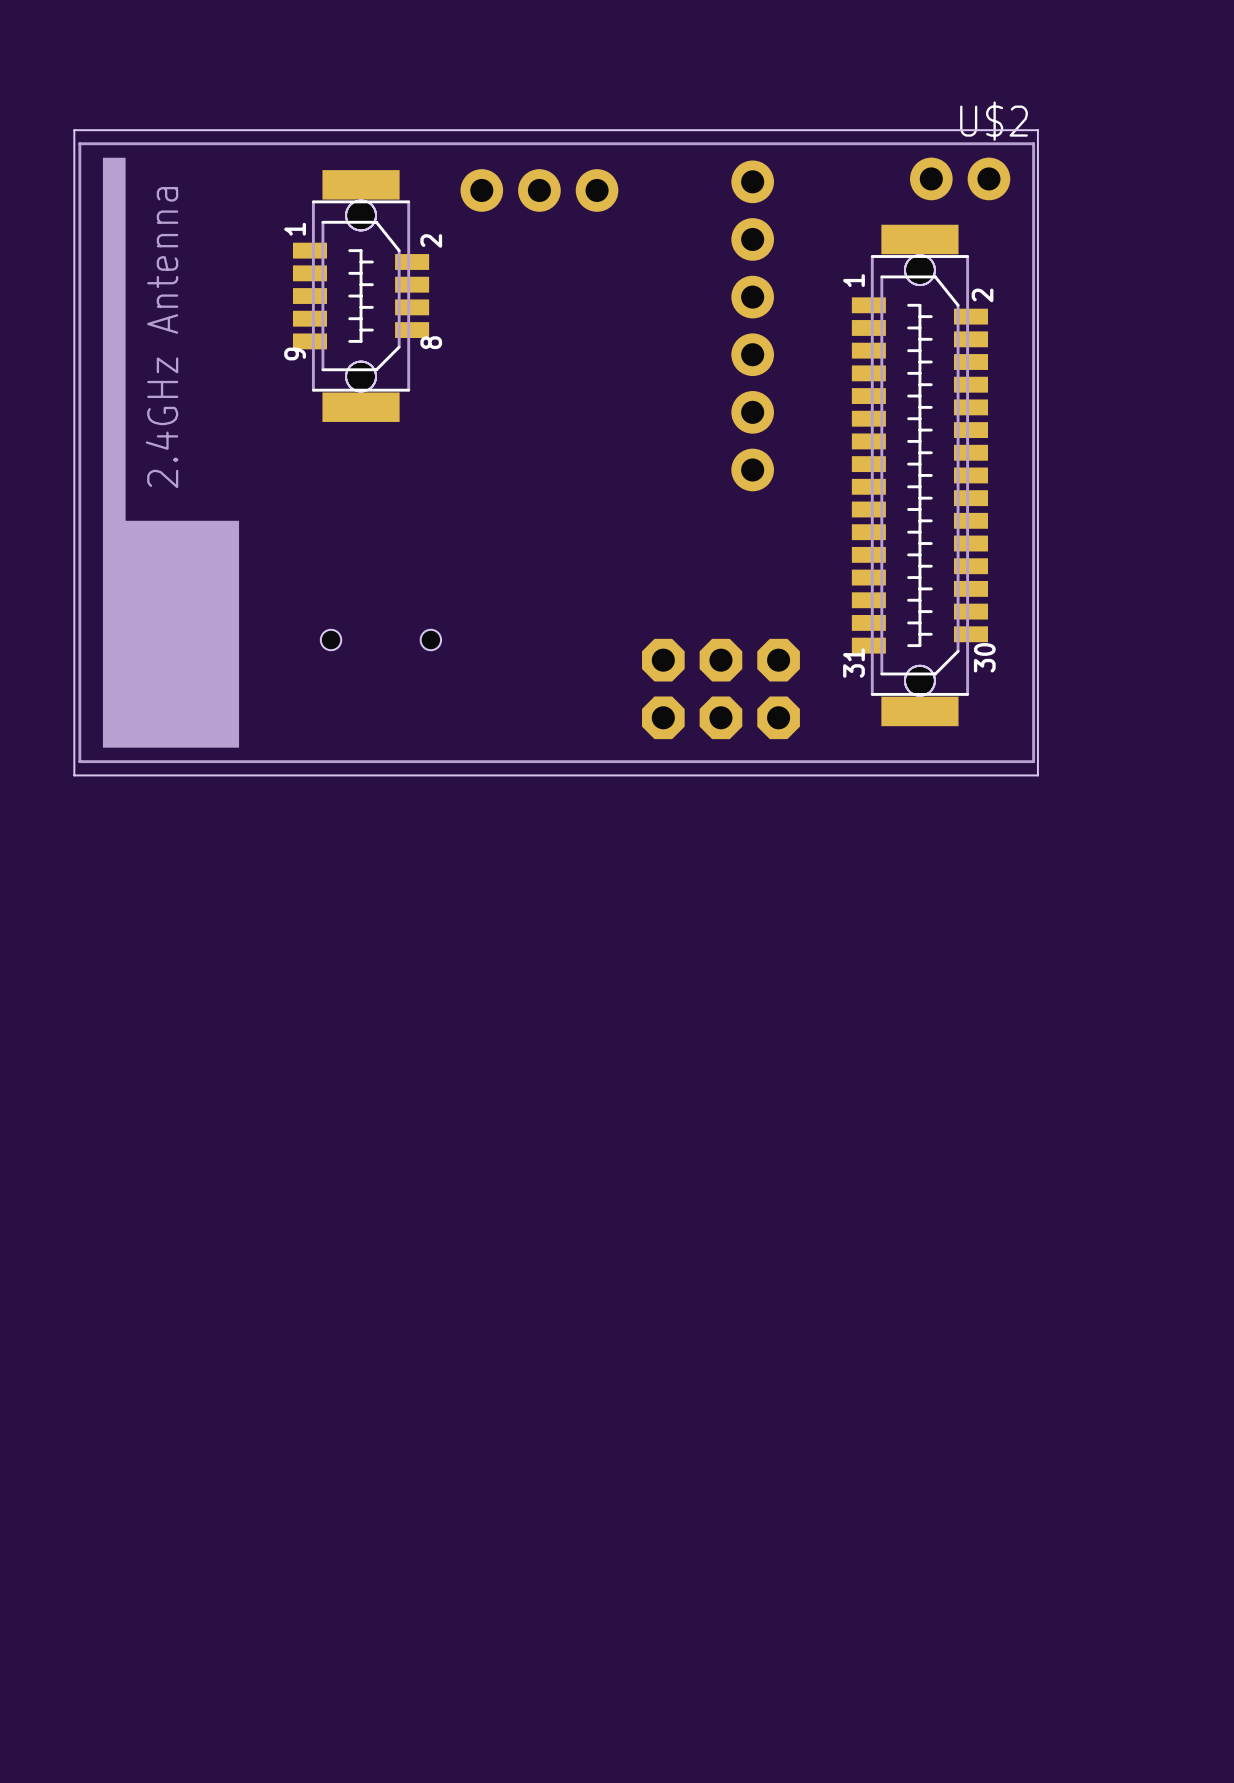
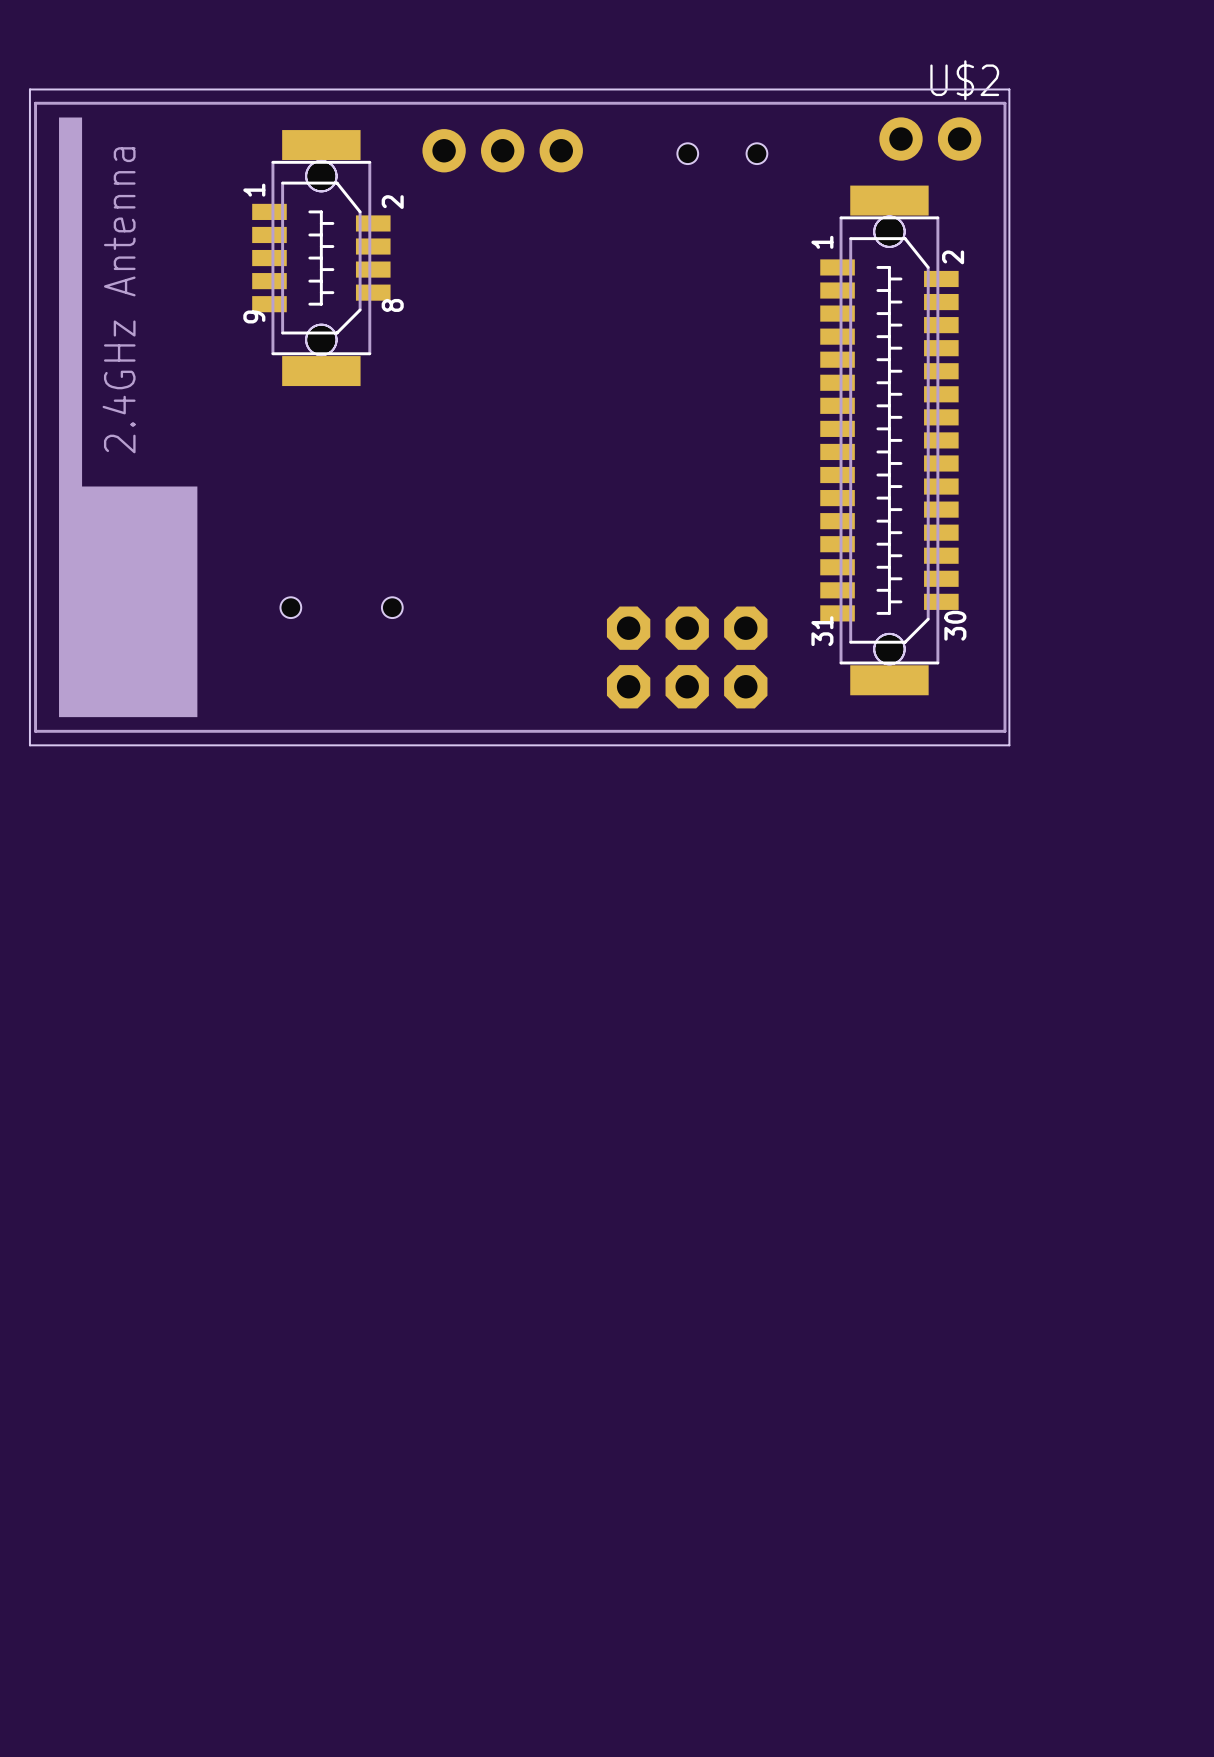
part: none -> (722, 153)
part: (752, 325) -> none

